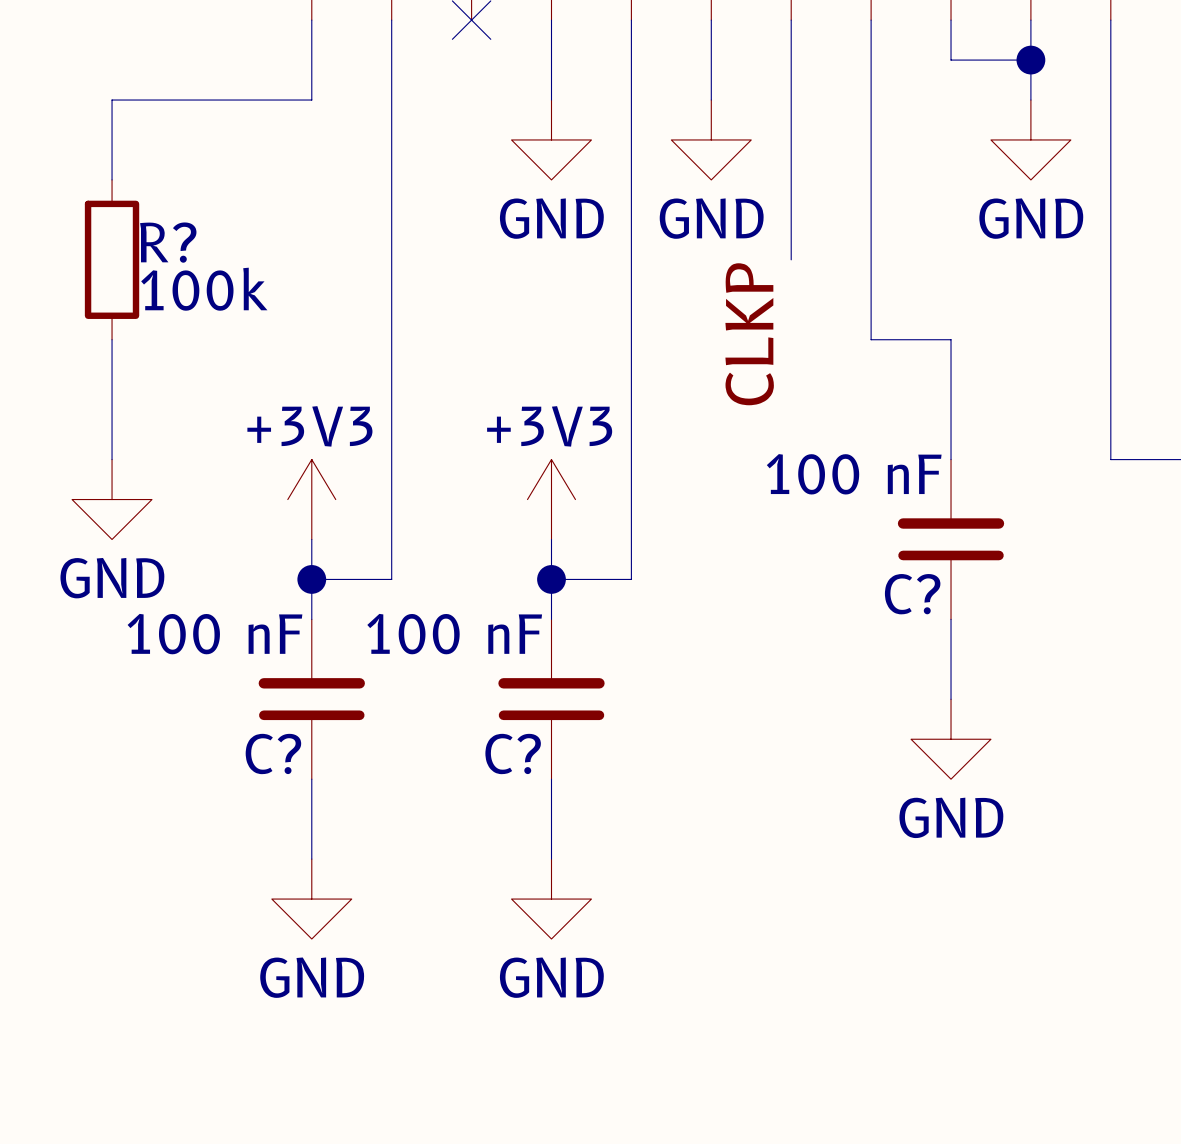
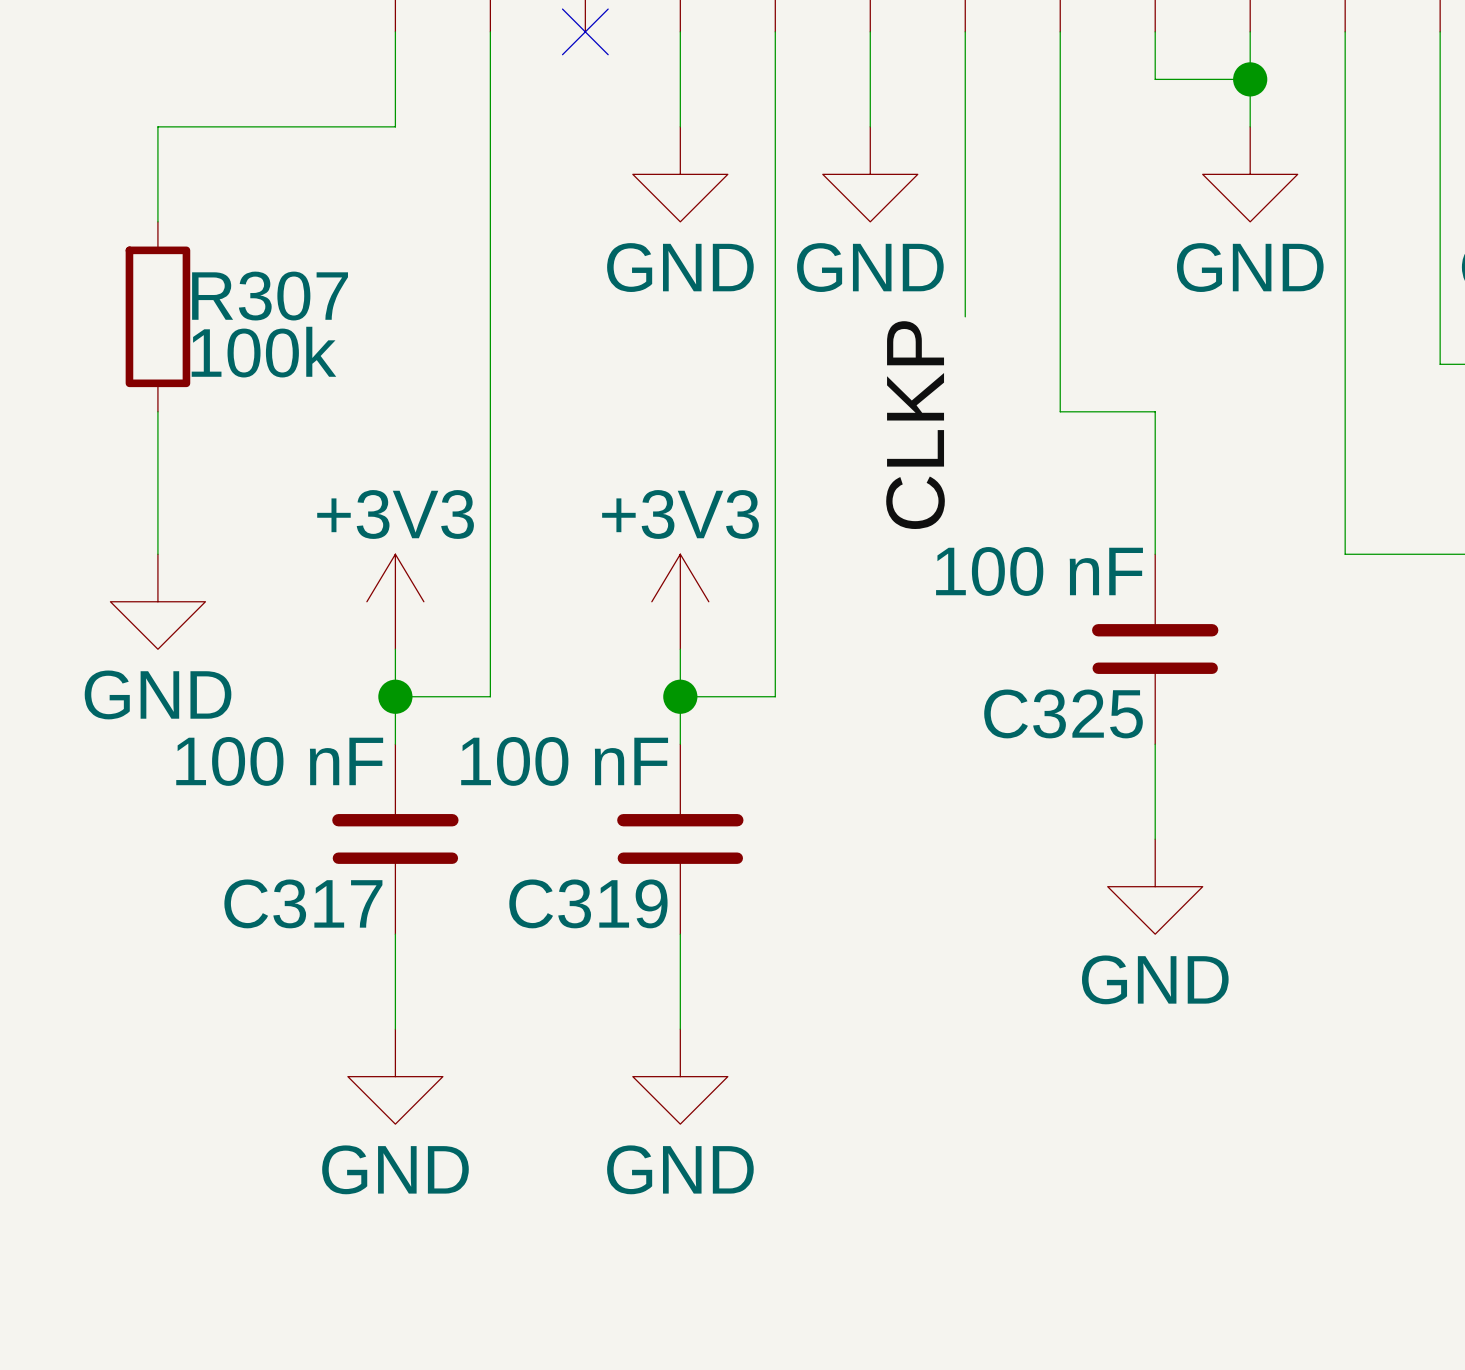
R? name: R? (168, 242) -> R307 (270, 296)
C? name: C? (912, 594) -> C325 (1063, 713)
C? name: C? (273, 753) -> C317 (303, 903)
C? name: C? (513, 753) -> C319 (588, 903)

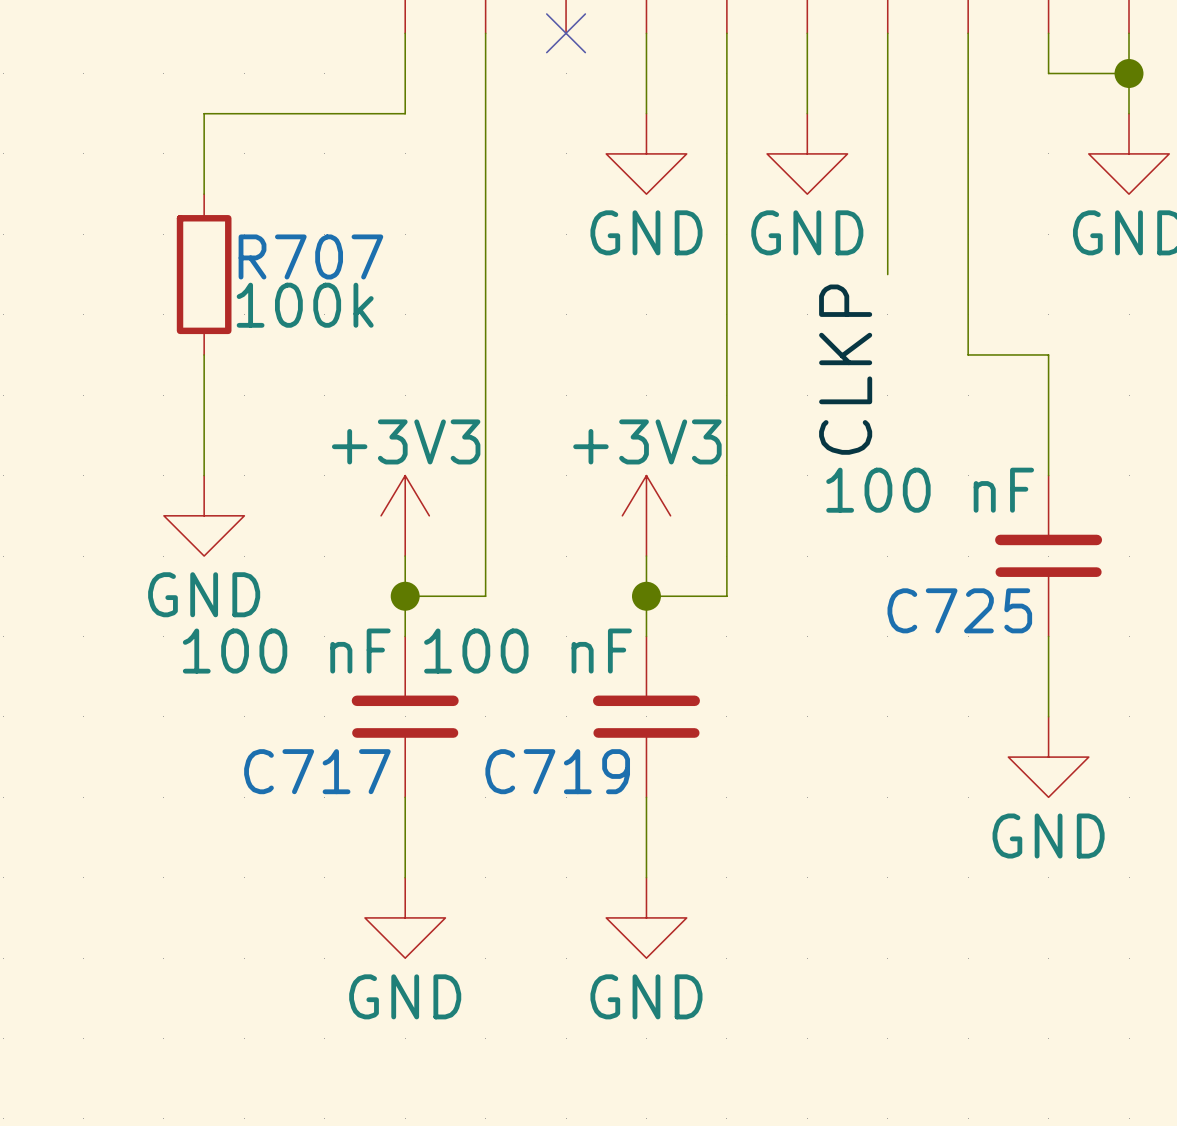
R307 name: R307 (270, 296) -> R707 (310, 256)
C325 name: C325 (1063, 713) -> C725 (959, 610)
C317 name: C317 (303, 903) -> C717 (317, 771)
C319 name: C319 (588, 903) -> C719 (557, 771)

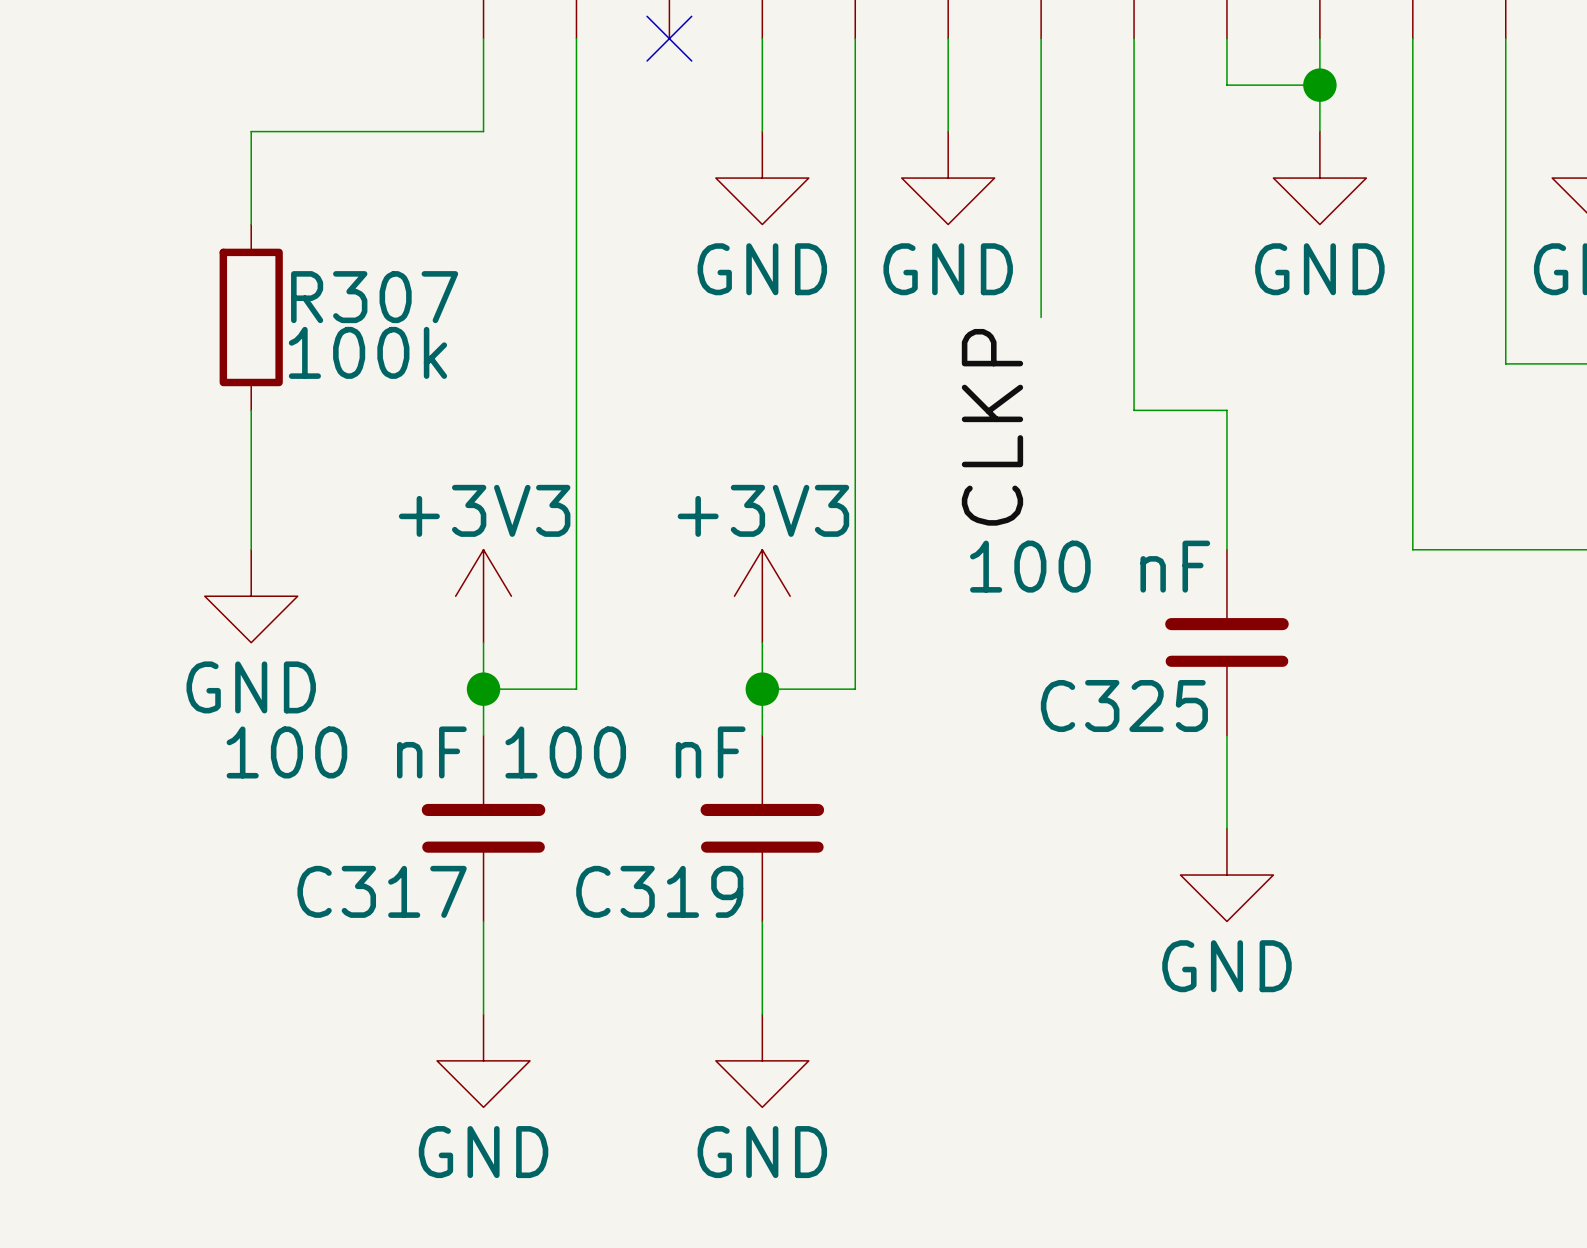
R707 name: R707 (310, 256) -> R307 (374, 297)
C725 name: C725 (959, 610) -> C325 (1124, 706)
C717 name: C717 (317, 771) -> C317 (382, 891)
C719 name: C719 (557, 771) -> C319 (659, 891)

